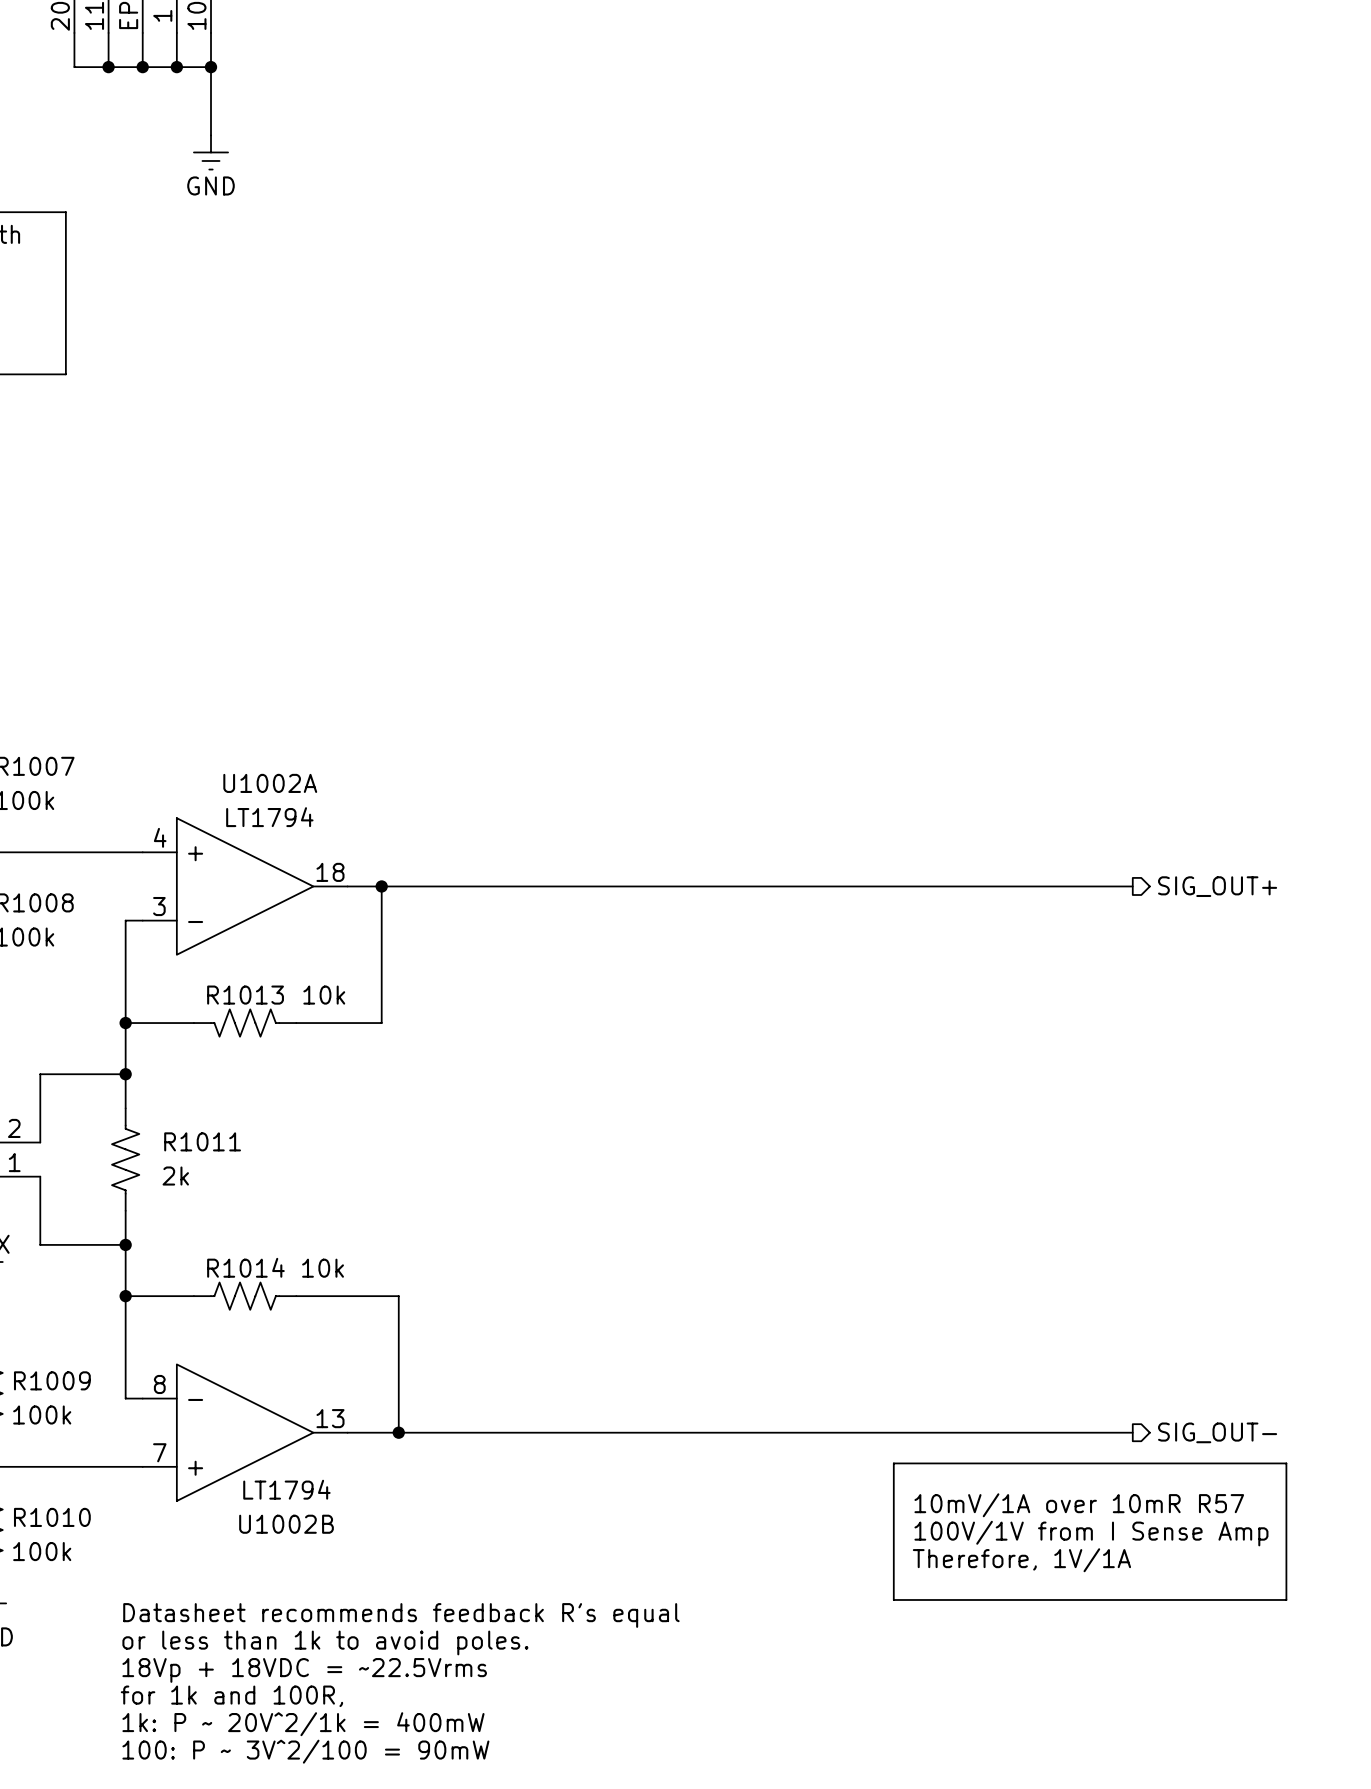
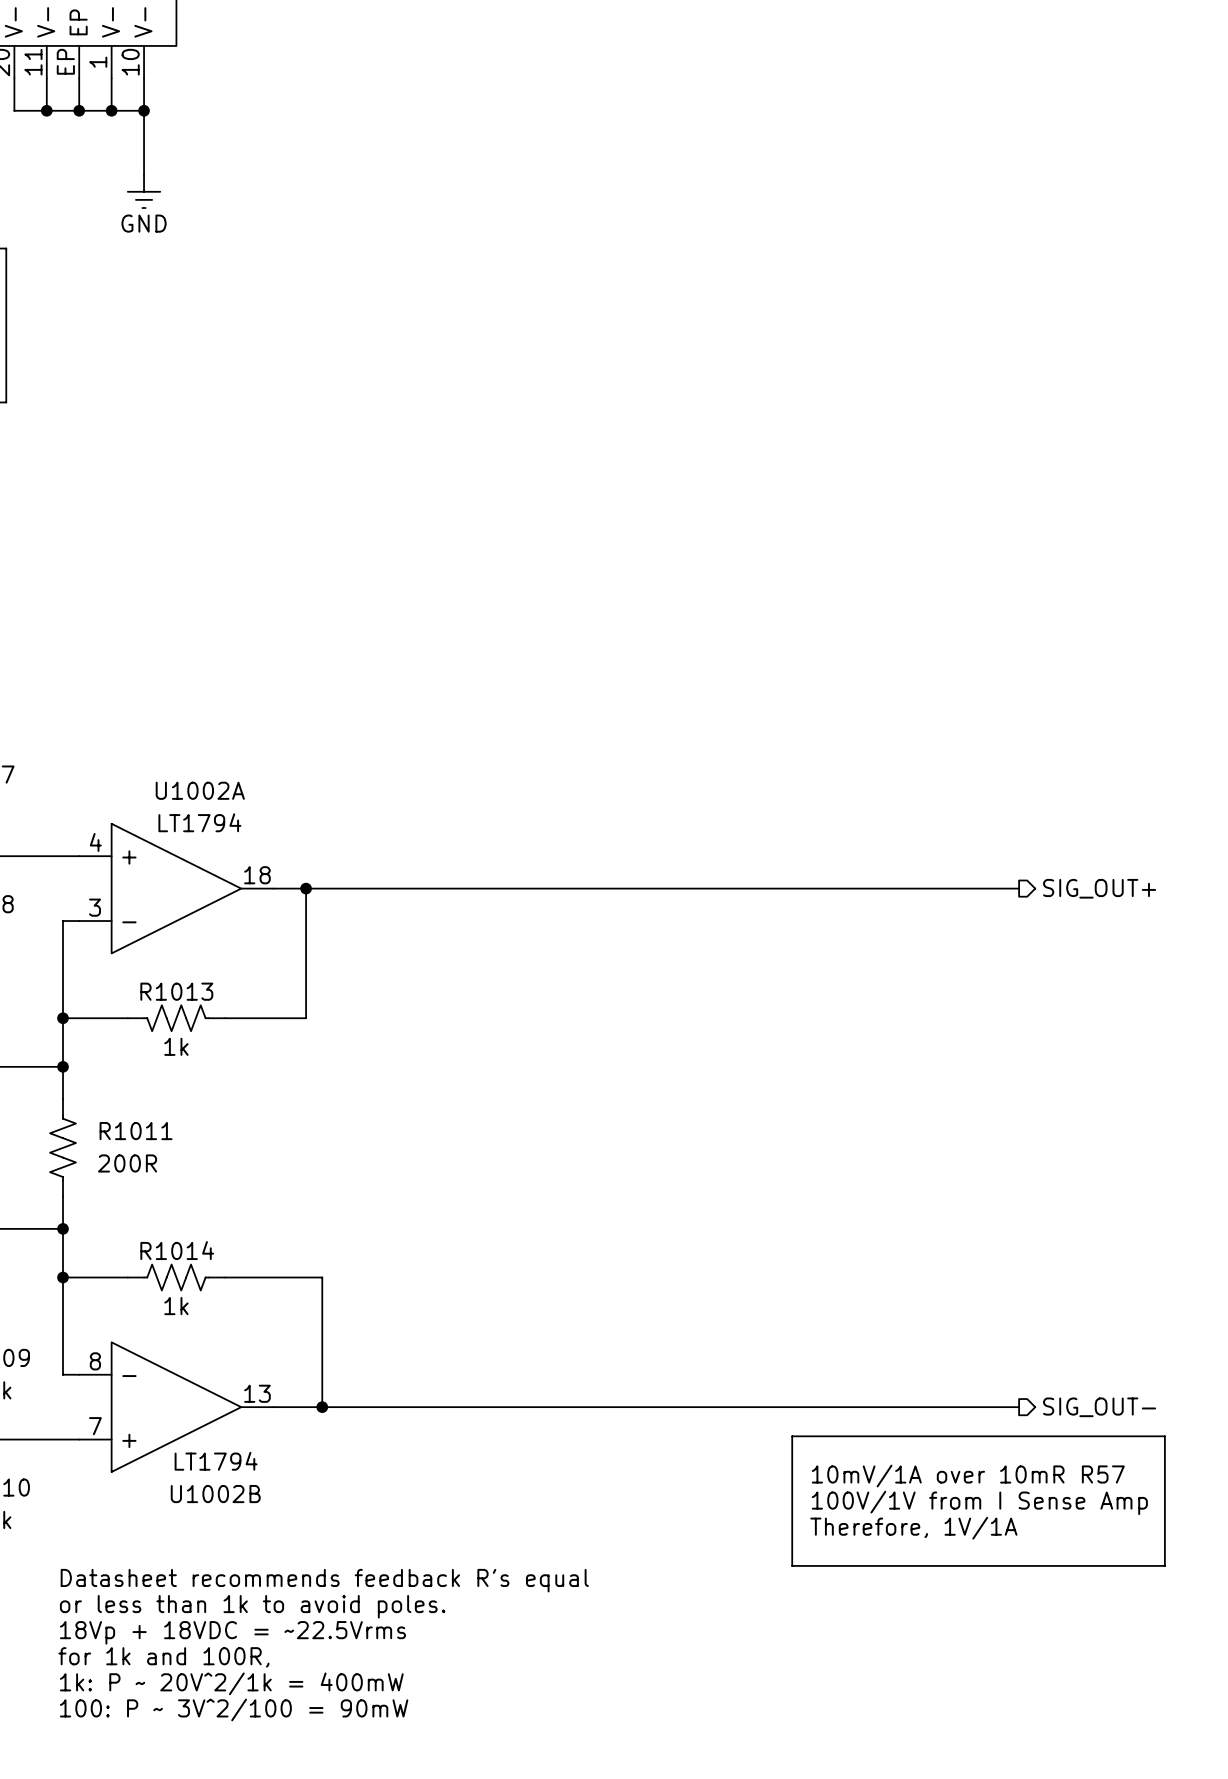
R1013 value: 10k (324, 995) -> 1k (176, 1046)
R1011 value: 2k (175, 1176) -> 200R (127, 1163)
R1014 value: 10k (323, 1268) -> 1k (176, 1306)

